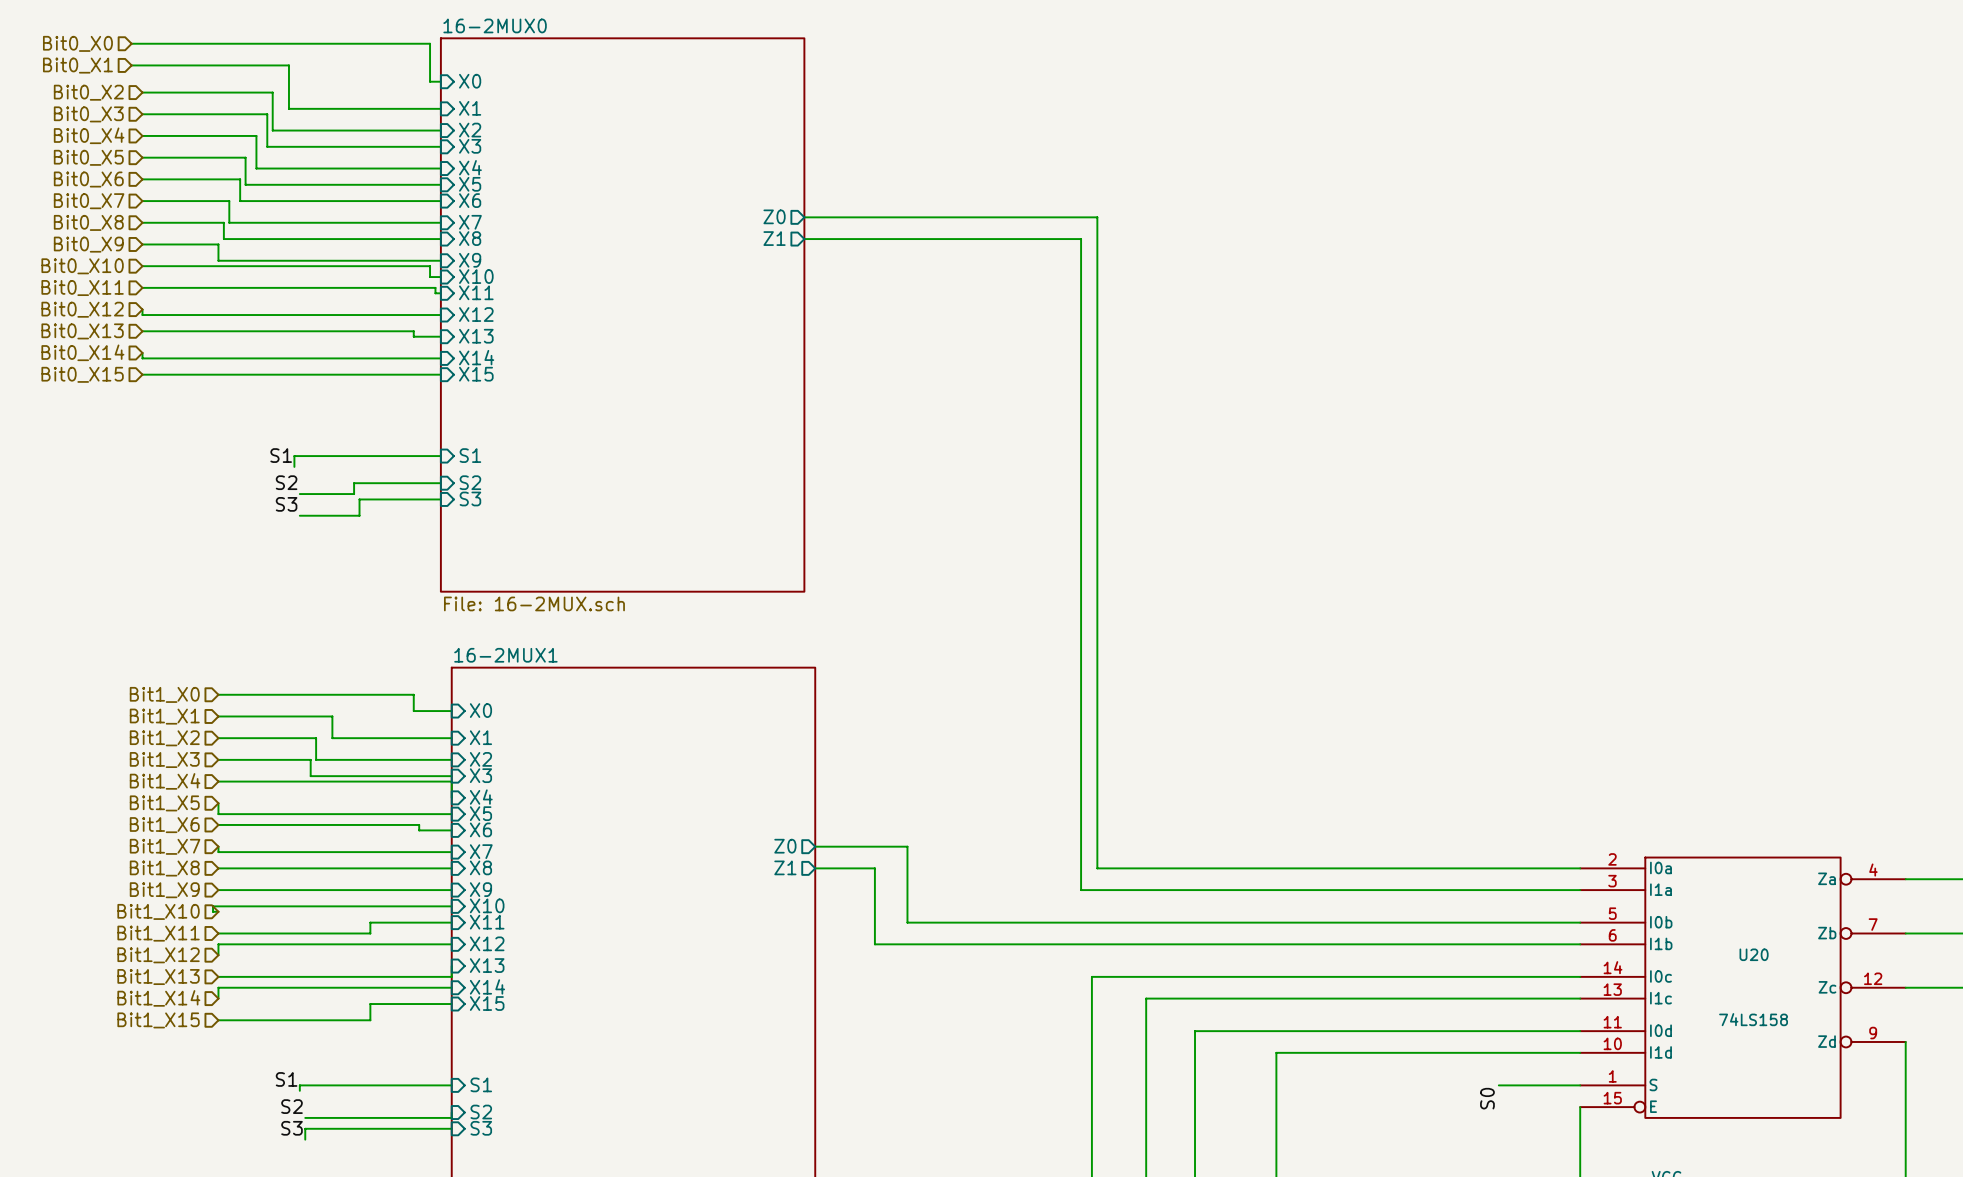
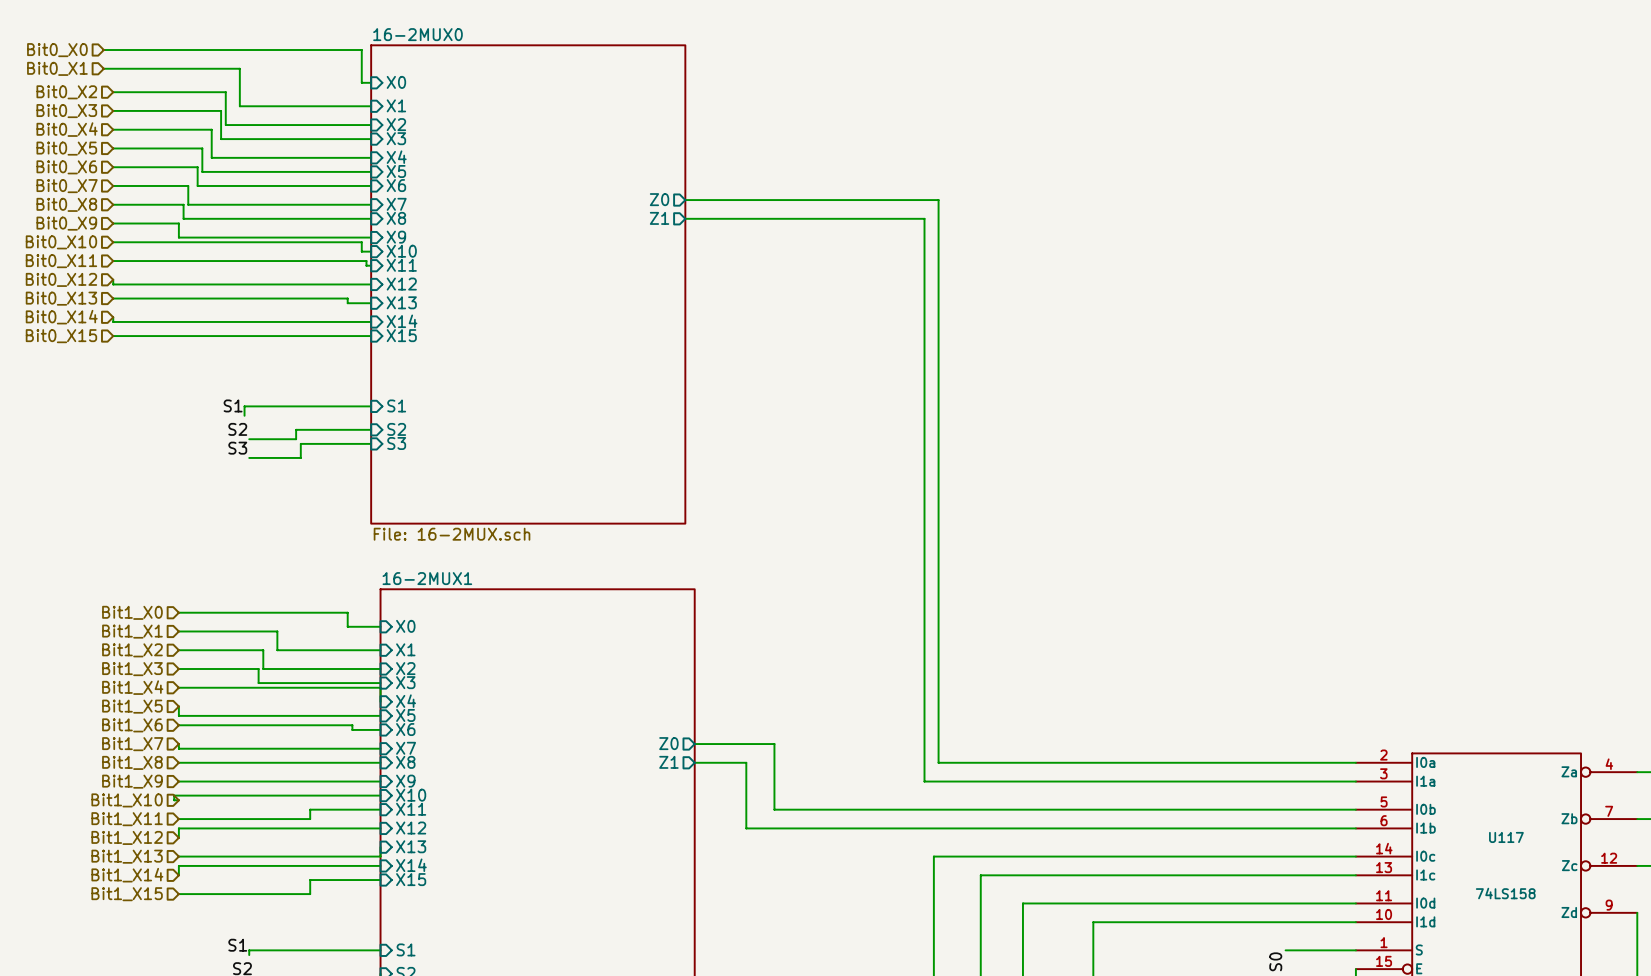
U20 name: U20 (1754, 954) -> U117 (1506, 837)

